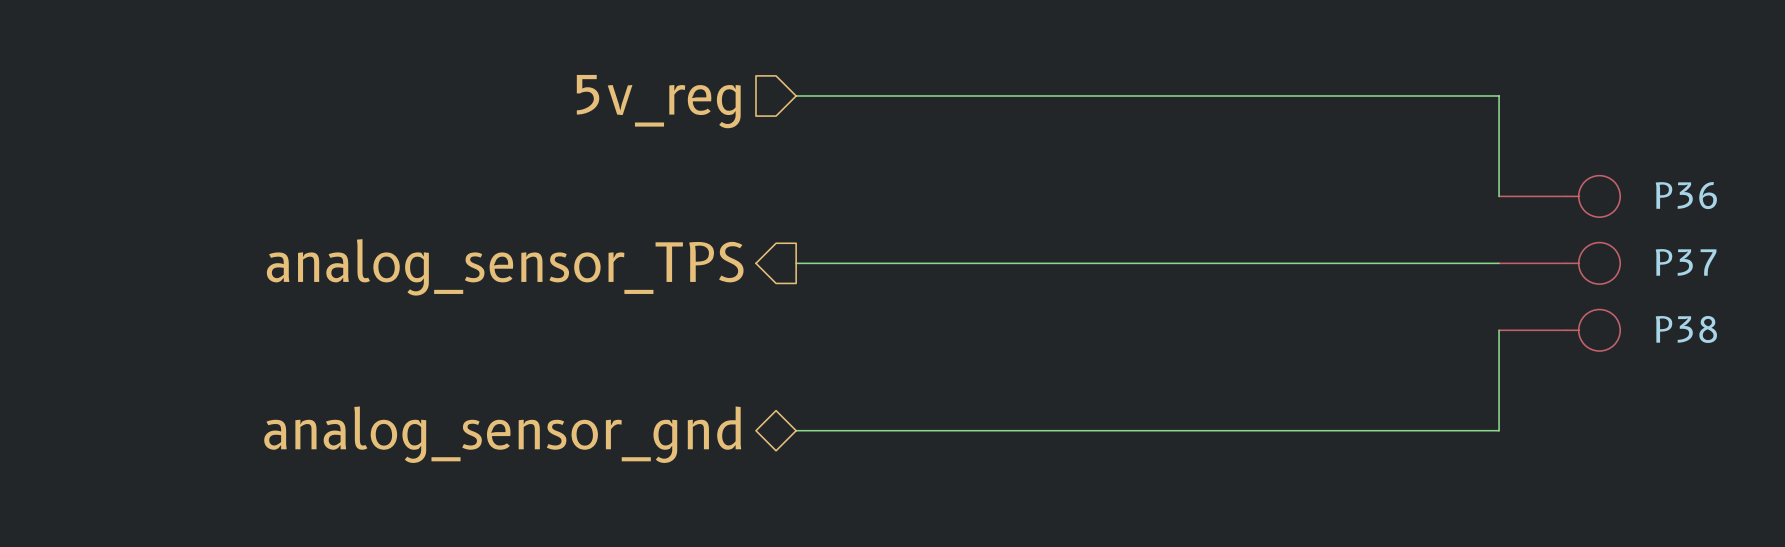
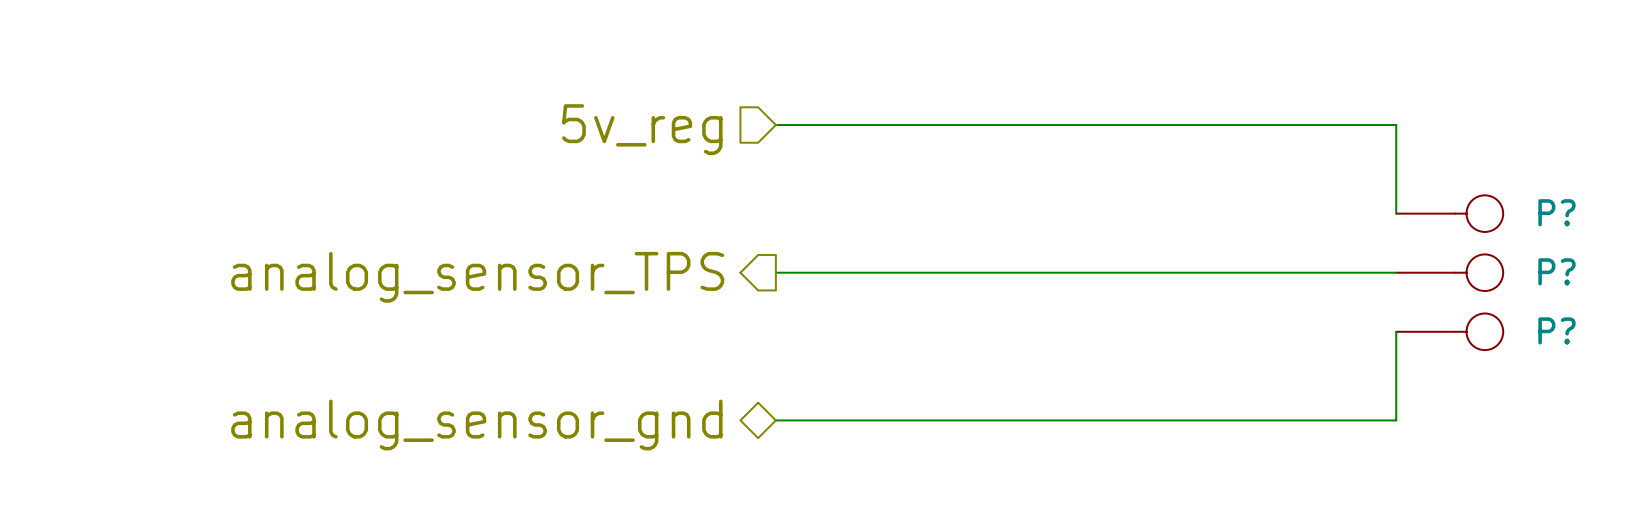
P36 name: P36 (1686, 195) -> P? (1556, 212)
P37 name: P37 (1686, 262) -> P? (1556, 271)
P38 name: P38 (1686, 329) -> P? (1556, 330)

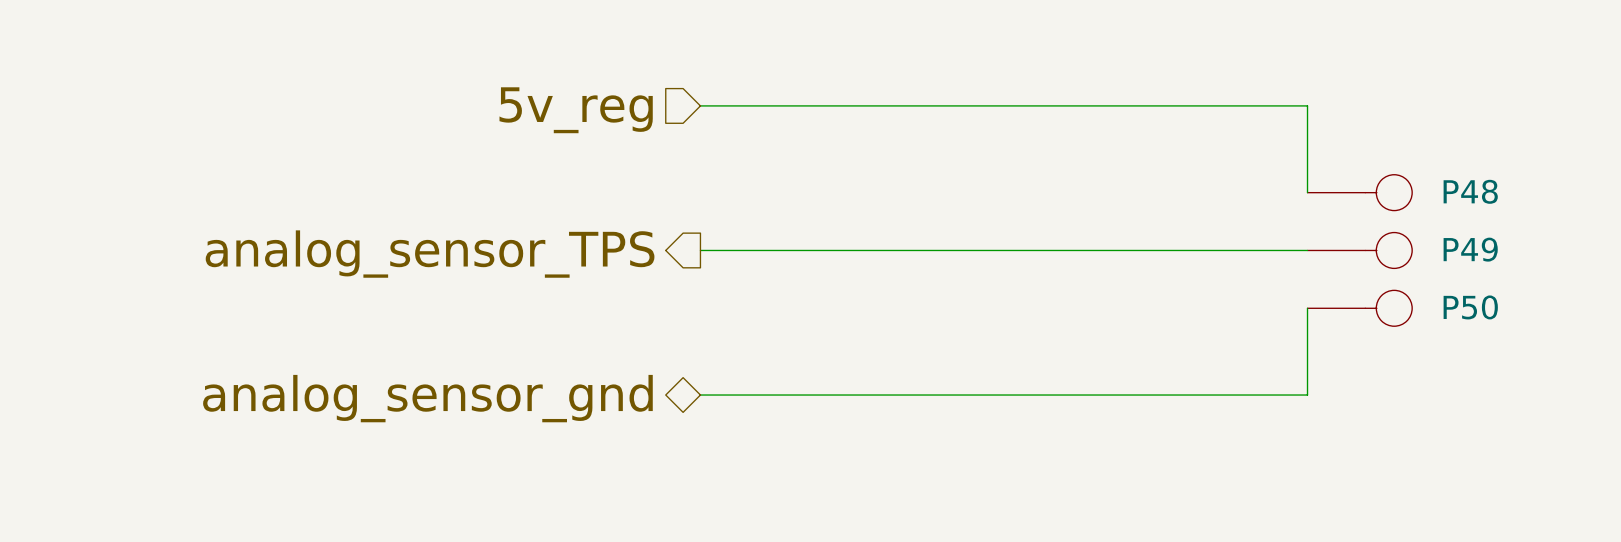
P? name: P? (1556, 212) -> P48 (1470, 191)
P? name: P? (1556, 271) -> P49 (1470, 249)
P? name: P? (1556, 330) -> P50 (1470, 307)

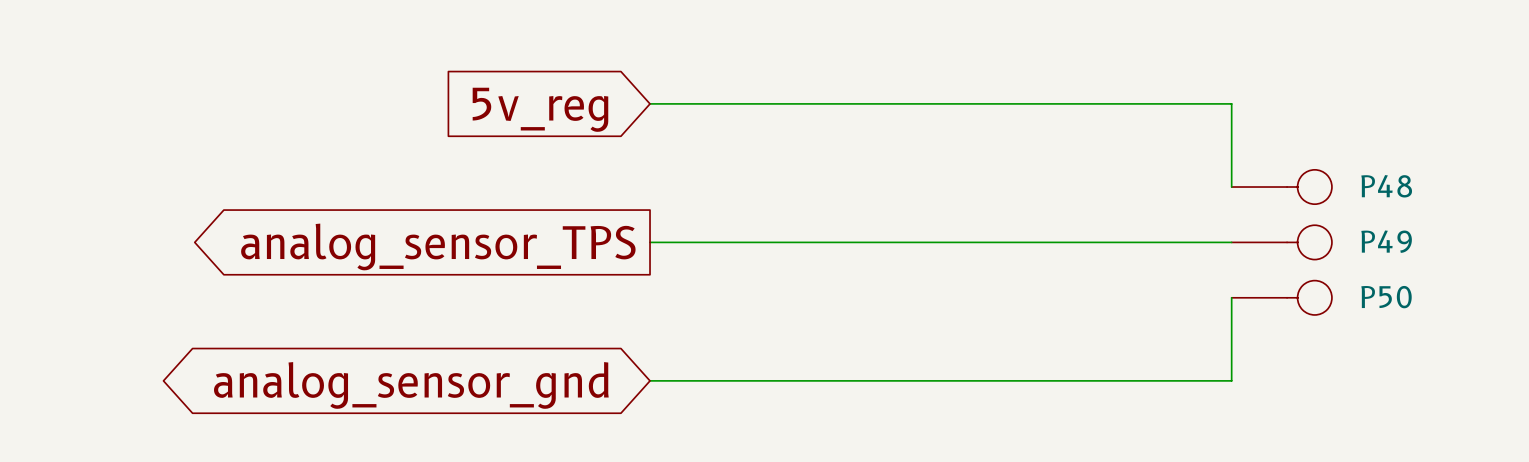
hierarchical label: 5v_reg (576, 110) -> none
global label: none -> 5v_reg (540, 109)
hierarchical label: analog_sensor_TPS (430, 254) -> none
global label: none -> analog_sensor_TPS (438, 246)
hierarchical label: analog_sensor_gnd (427, 398) -> none
global label: none -> analog_sensor_gnd (411, 385)

